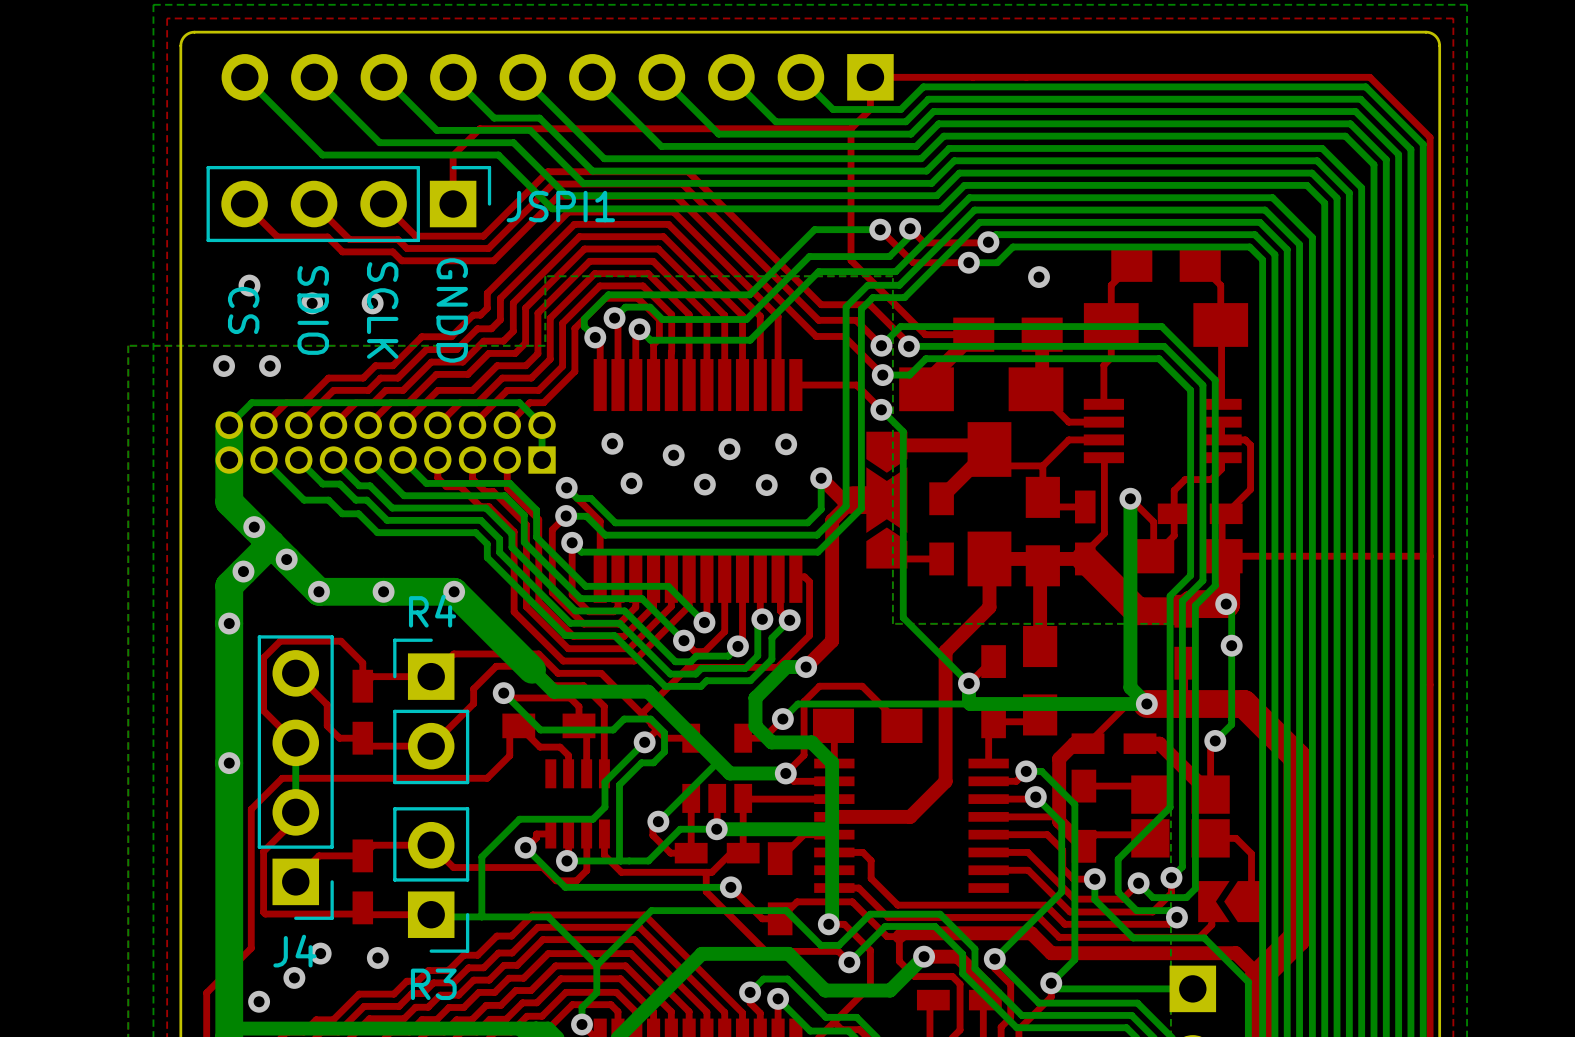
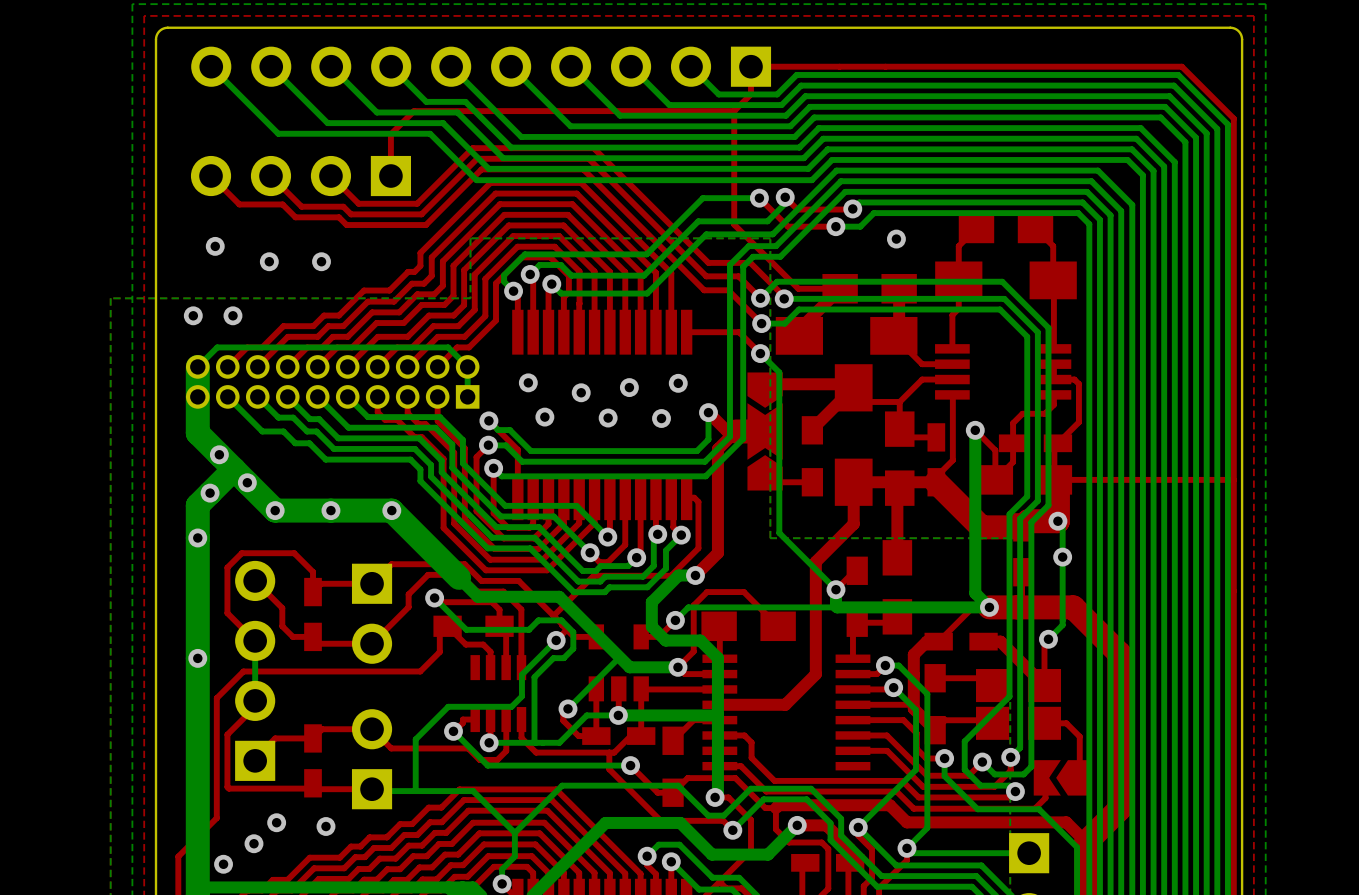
JSPI1 side: bottom (348, 204) -> top (300, 176)
text: CS (243, 310) -> none
text: SDIO (313, 310) -> none
text: SCLK (382, 310) -> none
text: GNDD (452, 310) -> none
R4 side: bottom (431, 711) -> top (372, 613)
J4 side: bottom (295, 777) -> top (255, 670)
R3 side: bottom (431, 879) -> top (372, 759)

